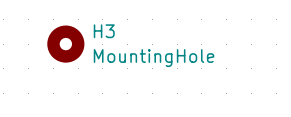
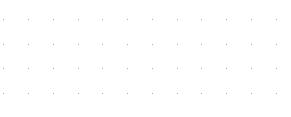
H3: MountingHole (65, 44) -> none

